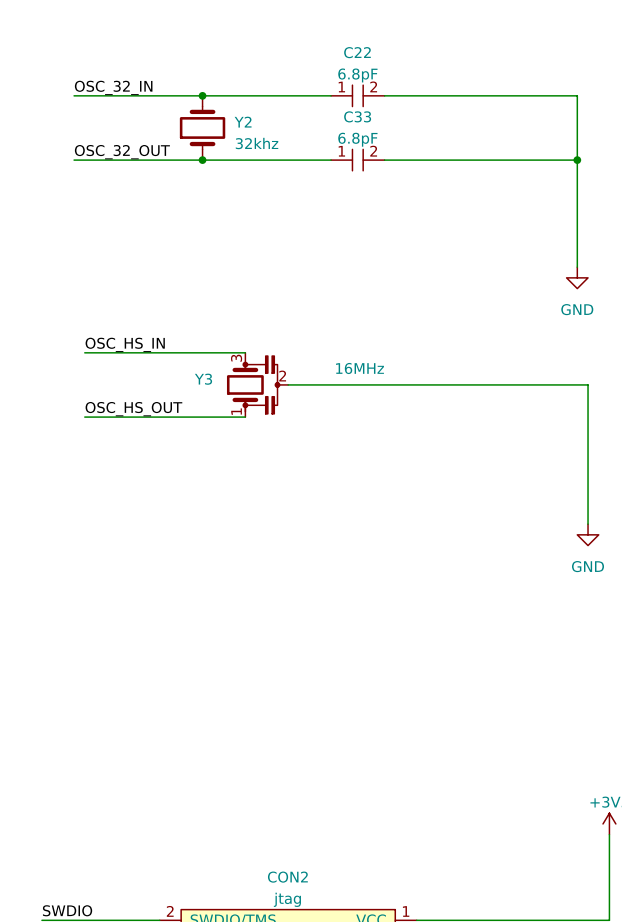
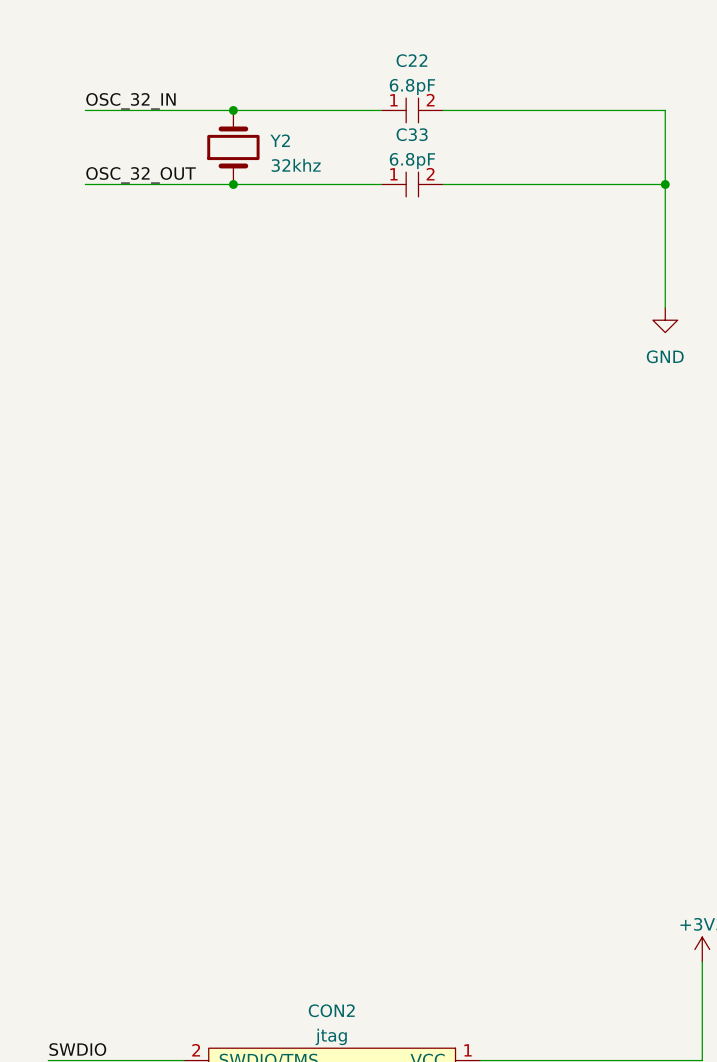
label: OSC_HS_IN (125, 344) -> none
wire: (84, 352) (245, 352) -> none
Y3: 16MHz (257, 384) -> none
wire: (288, 384) (588, 384) (588, 524) -> none
label: OSC_HS_OUT (133, 409) -> none
wire: (84, 417) (245, 417) -> none
power symbol: GND (588, 534) -> none

